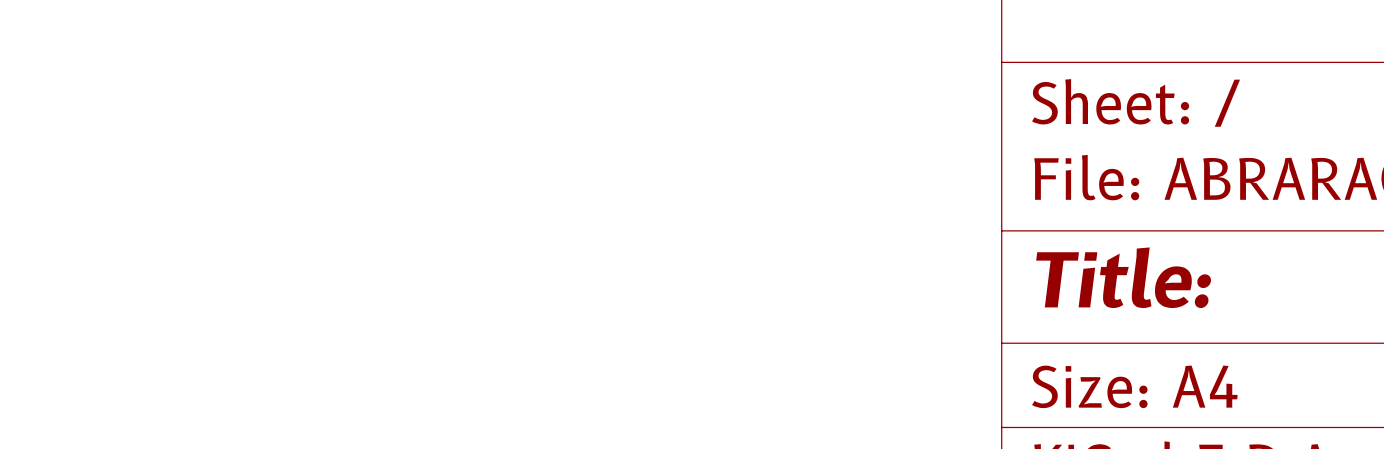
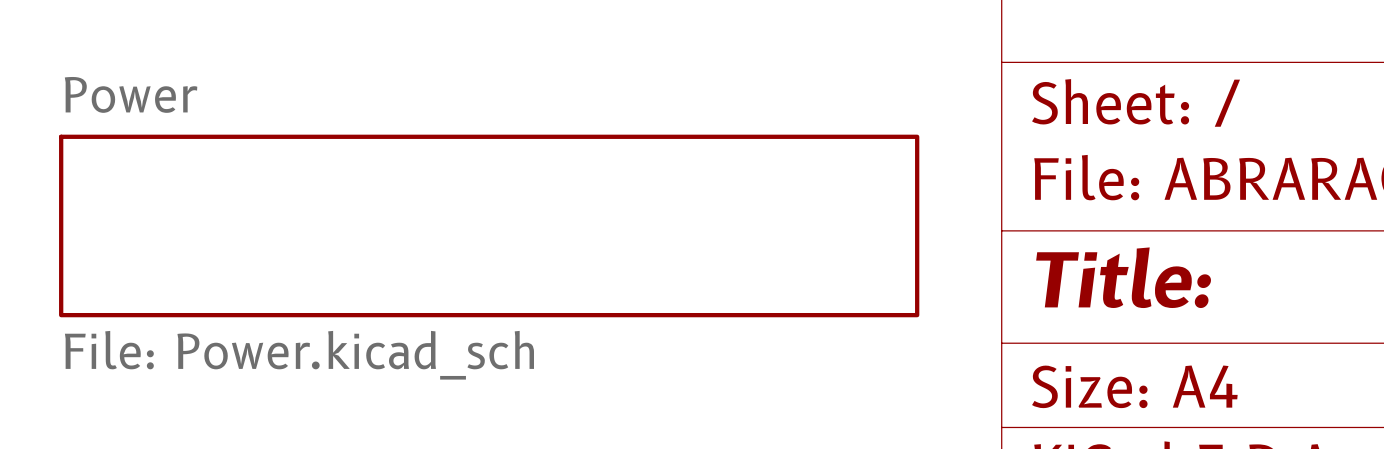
sheet Power: none -> File: Power.kicad_sch (489, 225)

